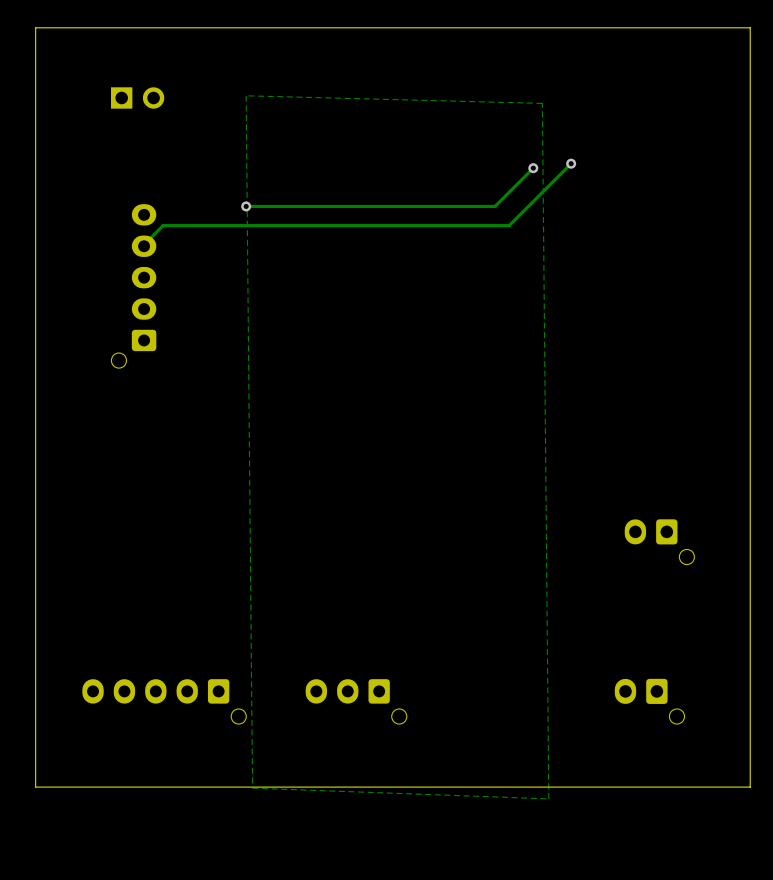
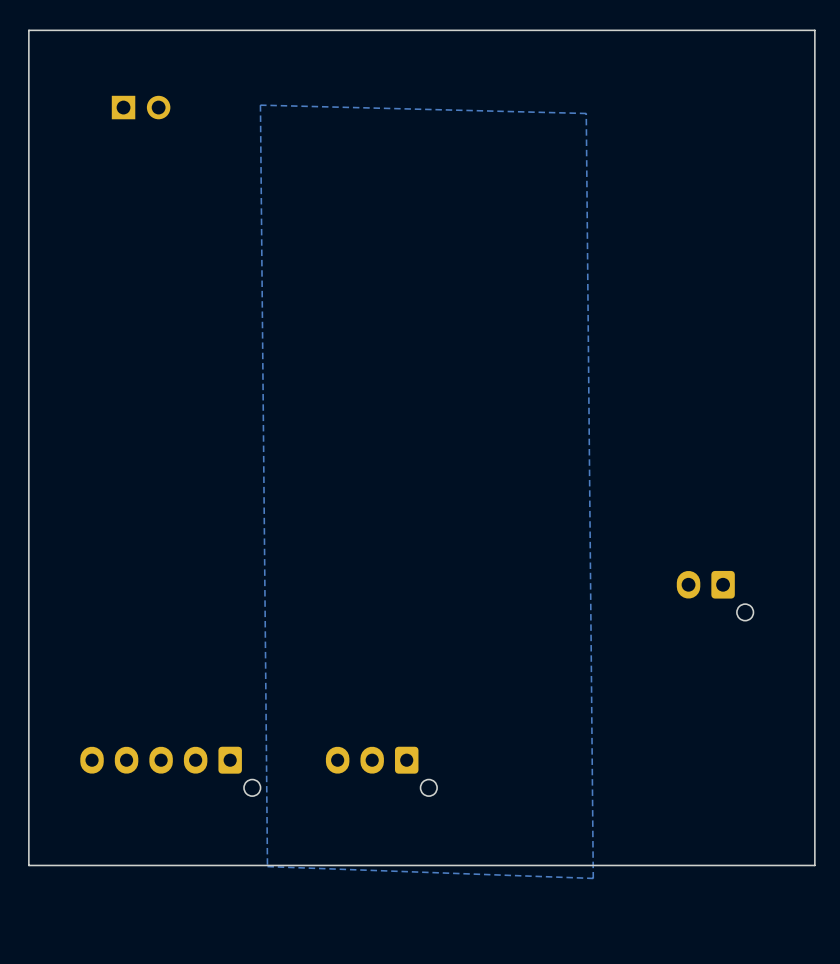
track: (571, 163) (509, 225) (163, 225) (144, 246) -> none
via: (571, 163) -> none
track: (533, 168) (495, 206) (246, 206) -> none
via: (533, 168) -> none
via: (246, 206) -> none
part: (133, 286) -> none
part: (649, 701) -> none

